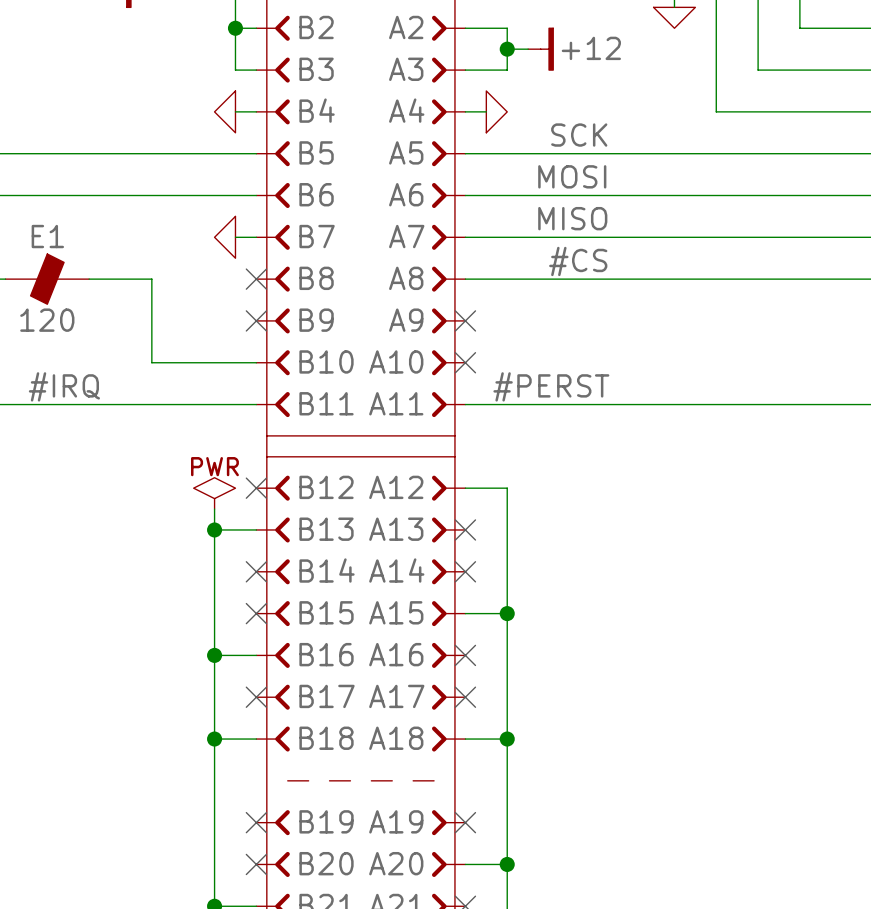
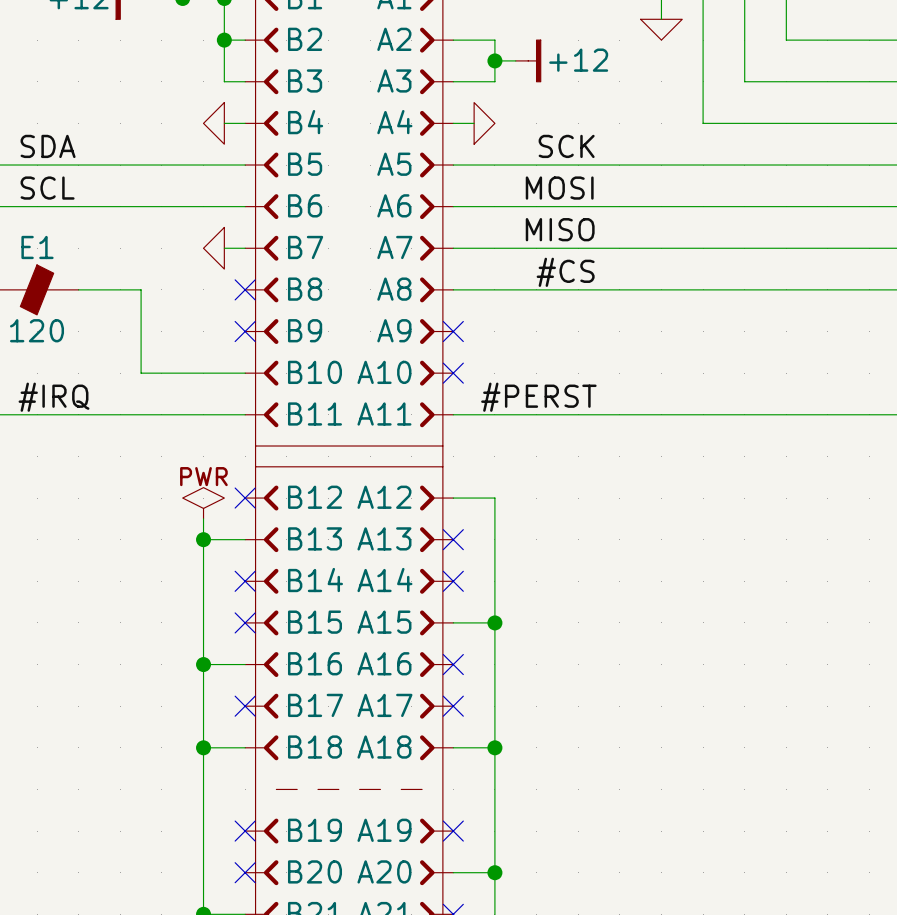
label: none -> SDA (48, 146)
label: none -> SCL (47, 188)

